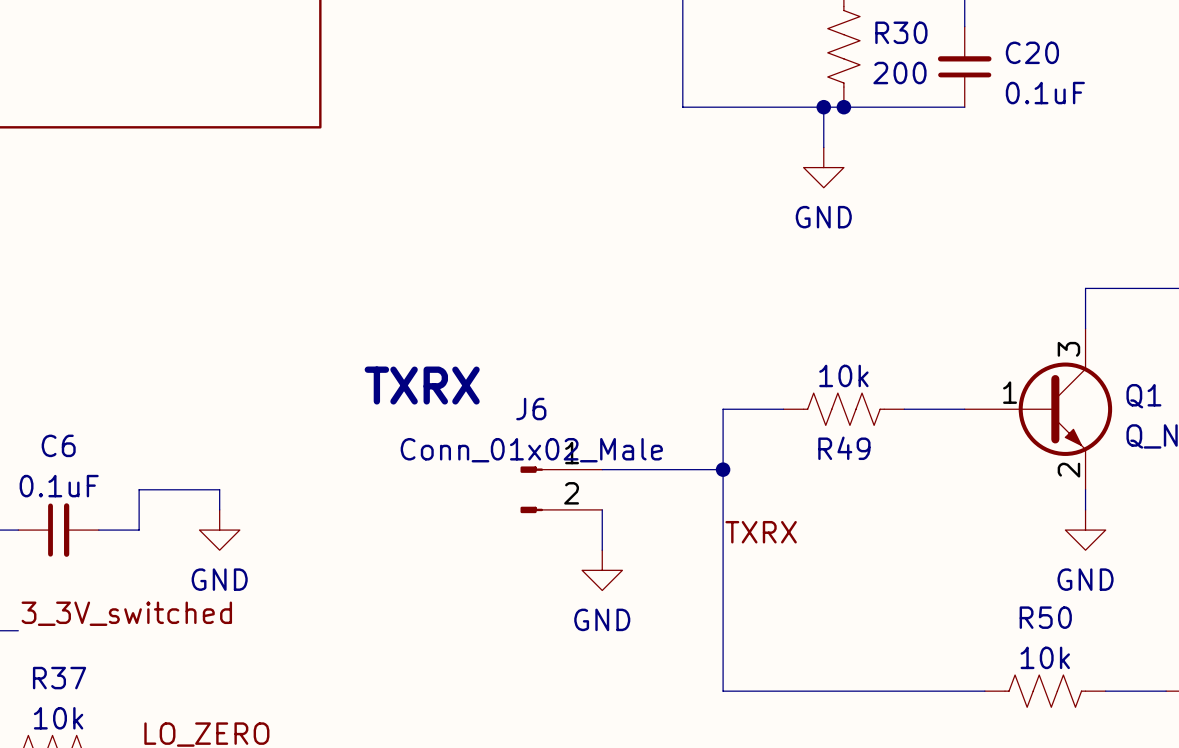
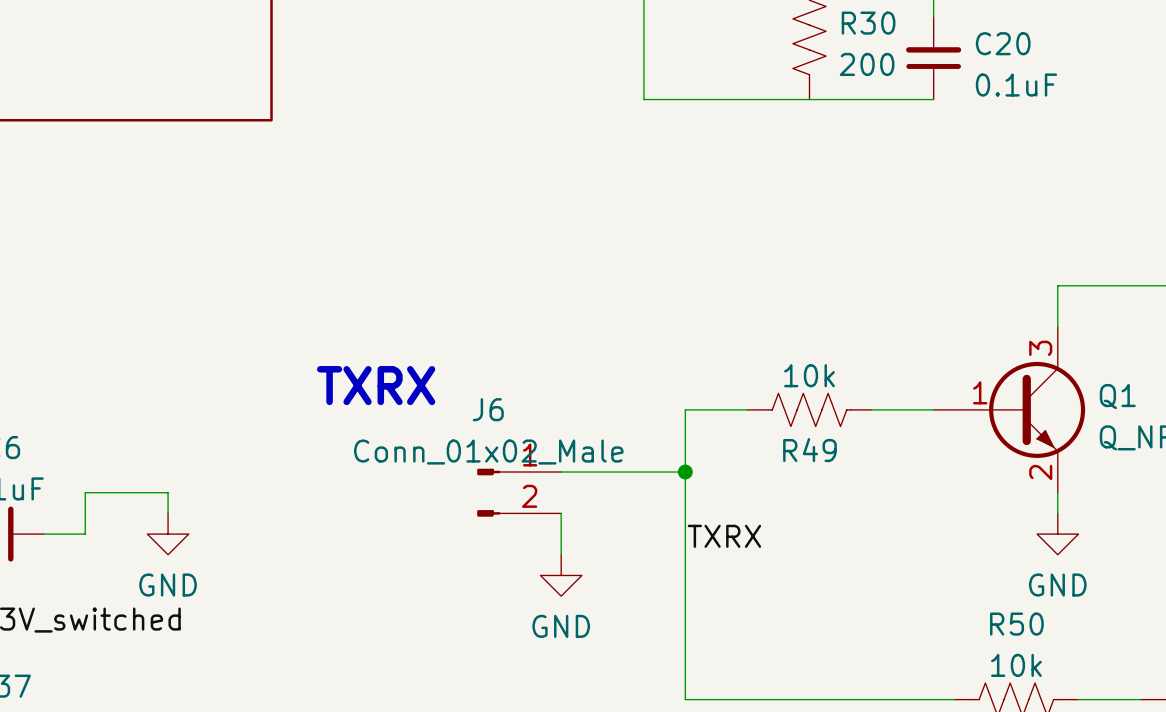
wire: (823, 107) (823, 147) -> none
junction: (823, 107) -> none
junction: (843, 107) -> none
power symbol: GND (823, 167) -> none

